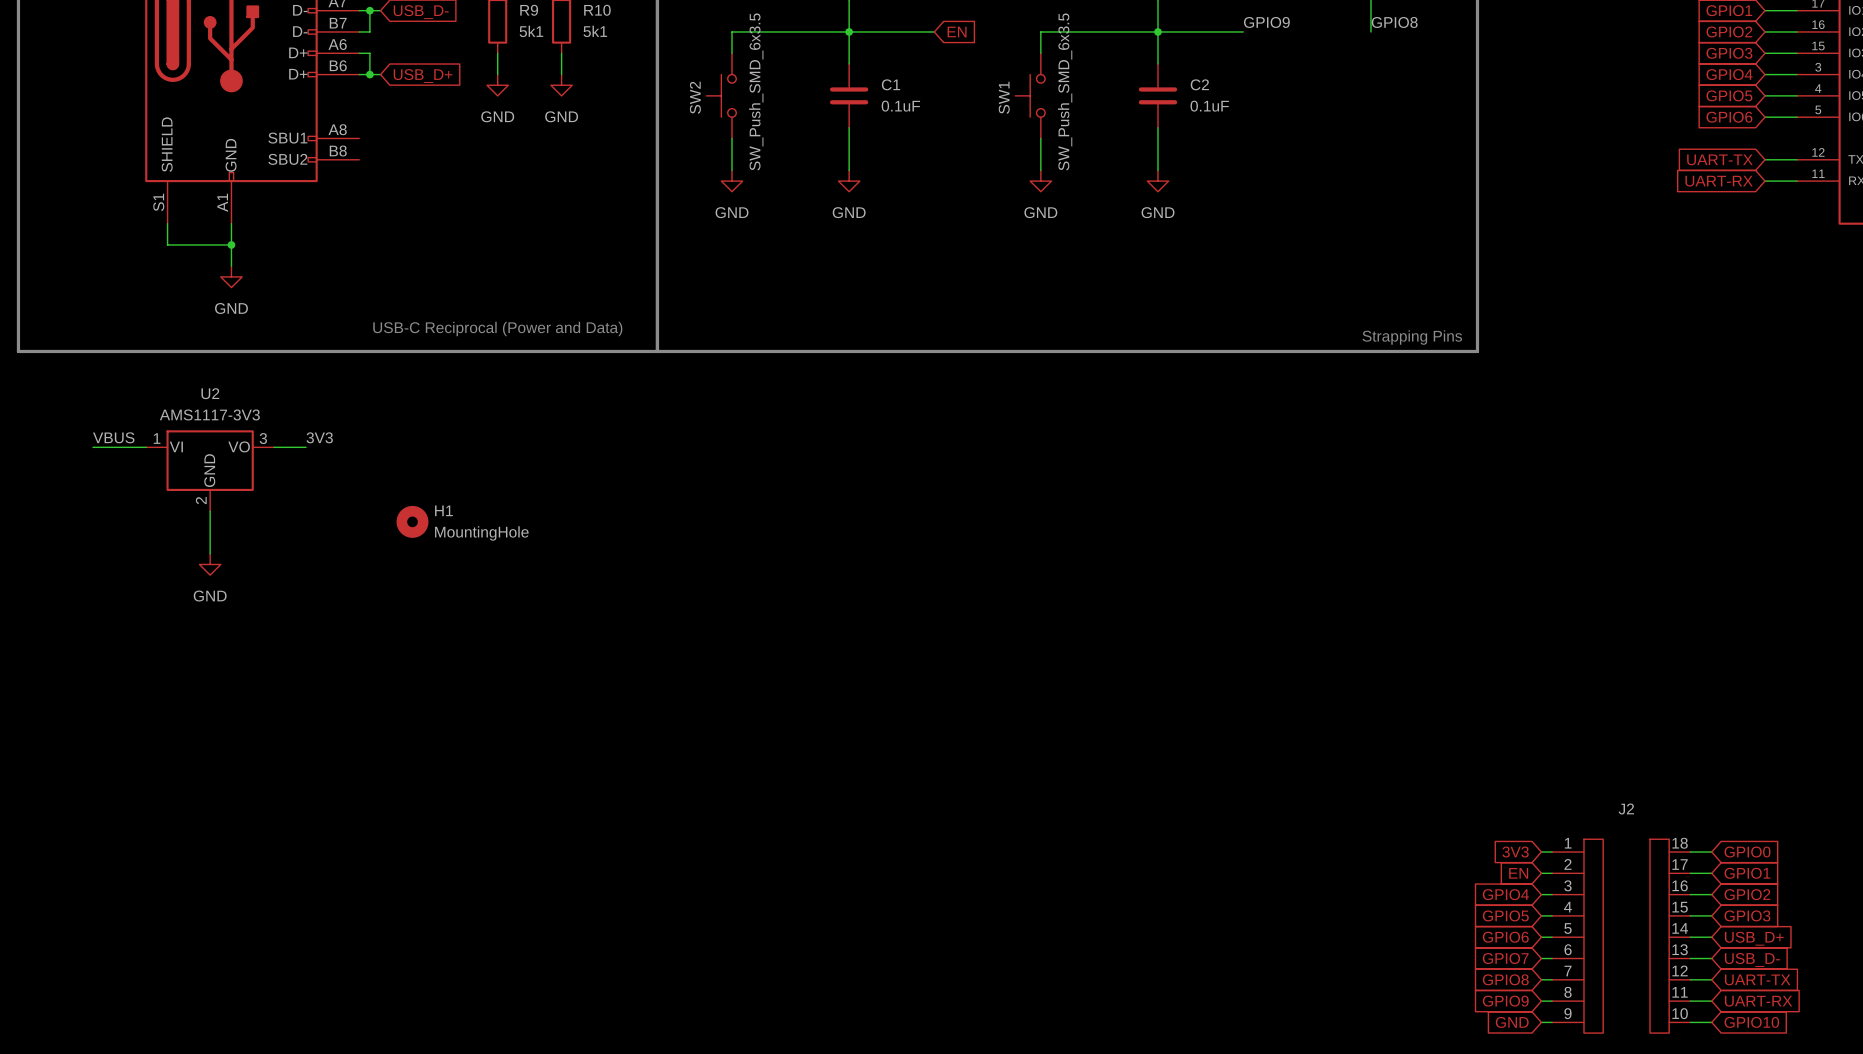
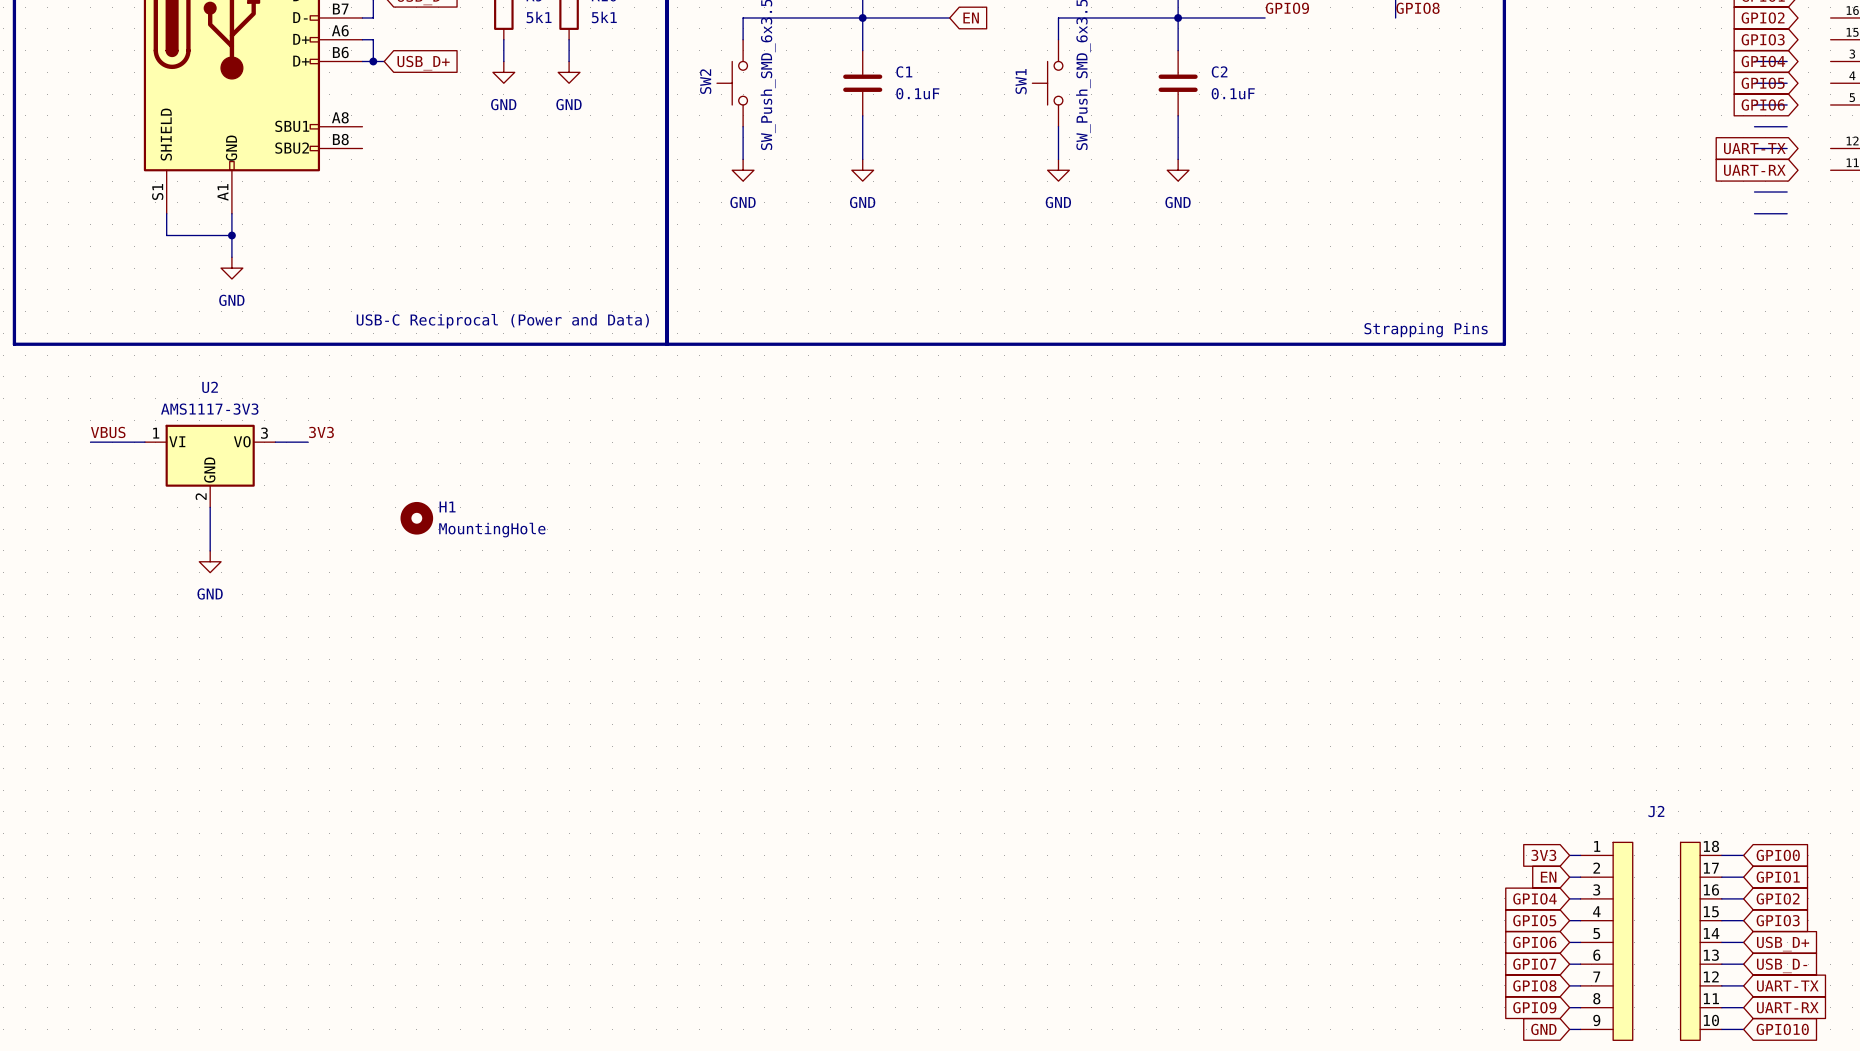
wire: (1765, 31) (1796, 31) -> (1754, 61) (1787, 61)
wire: (1765, 53) (1796, 53) -> (1754, 83) (1787, 83)
wire: (1765, 74) (1796, 74) -> (1754, 104) (1787, 104)
wire: (1765, 95) (1796, 95) -> (1754, 126) (1787, 126)
wire: (1765, 117) (1796, 117) -> (1754, 148) (1787, 148)
wire: (1765, 159) (1796, 159) -> (1754, 192) (1787, 192)
wire: (1765, 181) (1796, 181) -> (1754, 213) (1787, 213)

